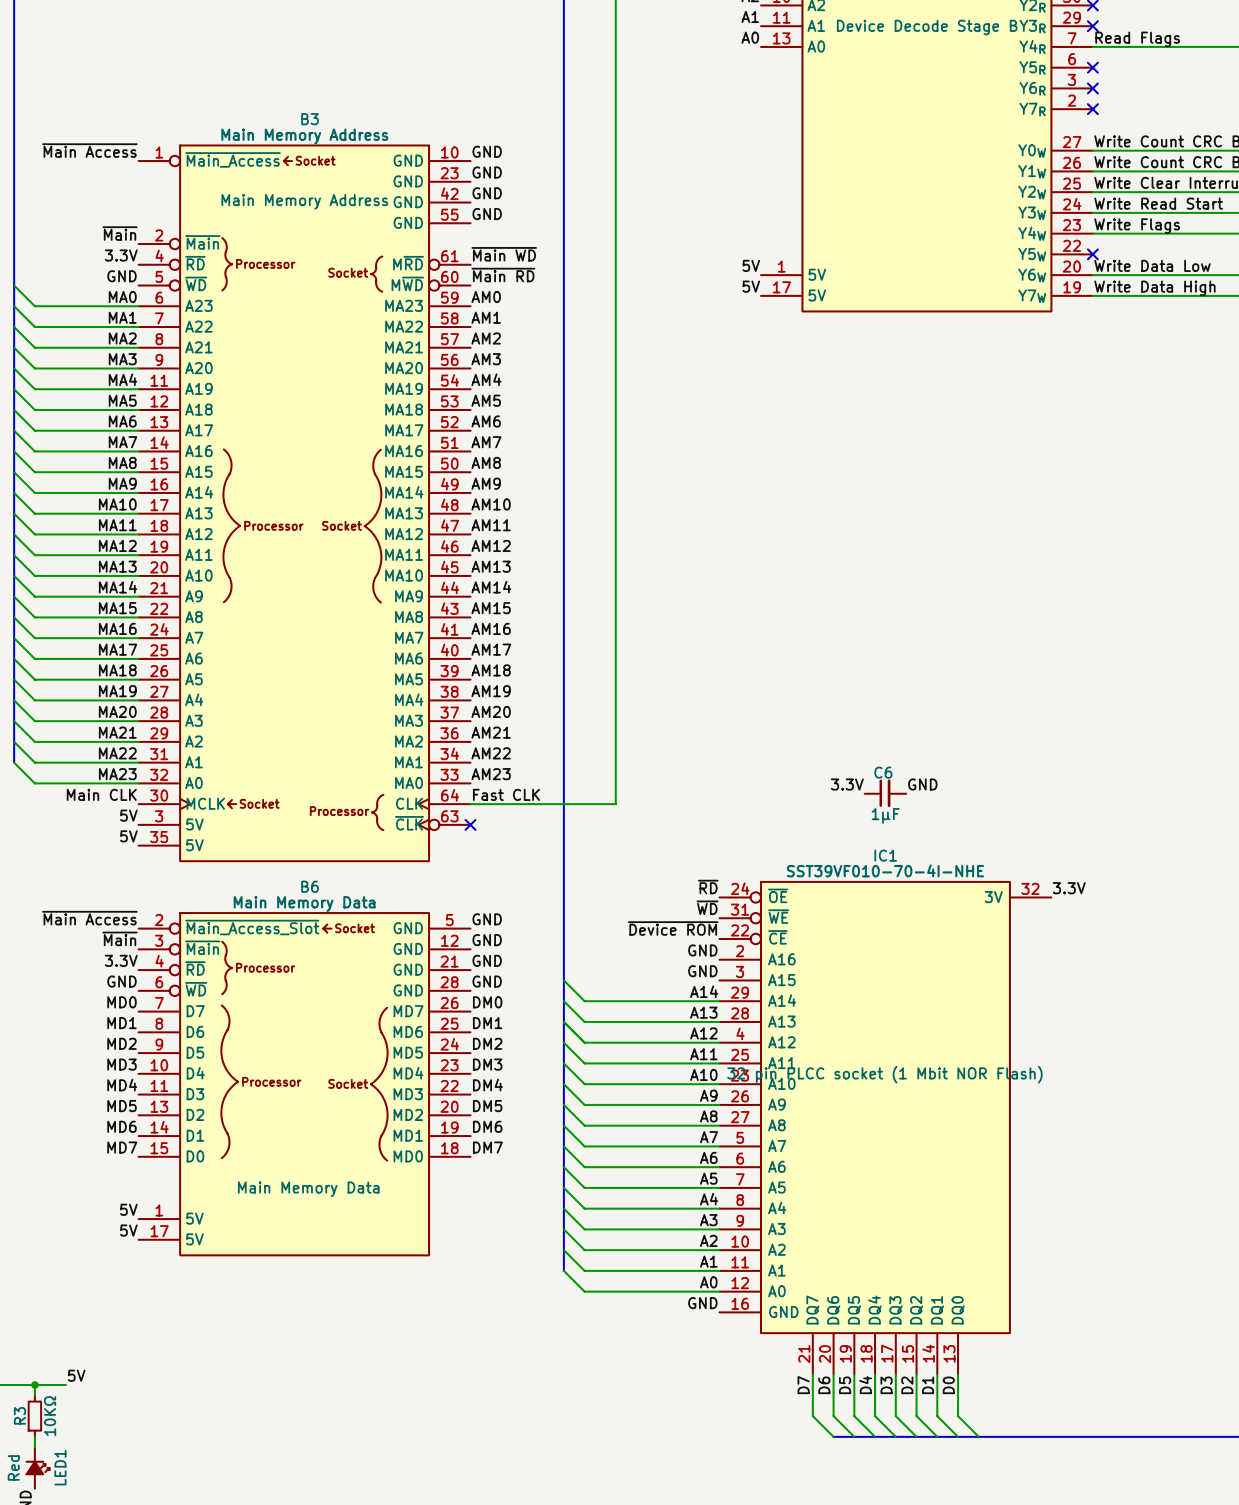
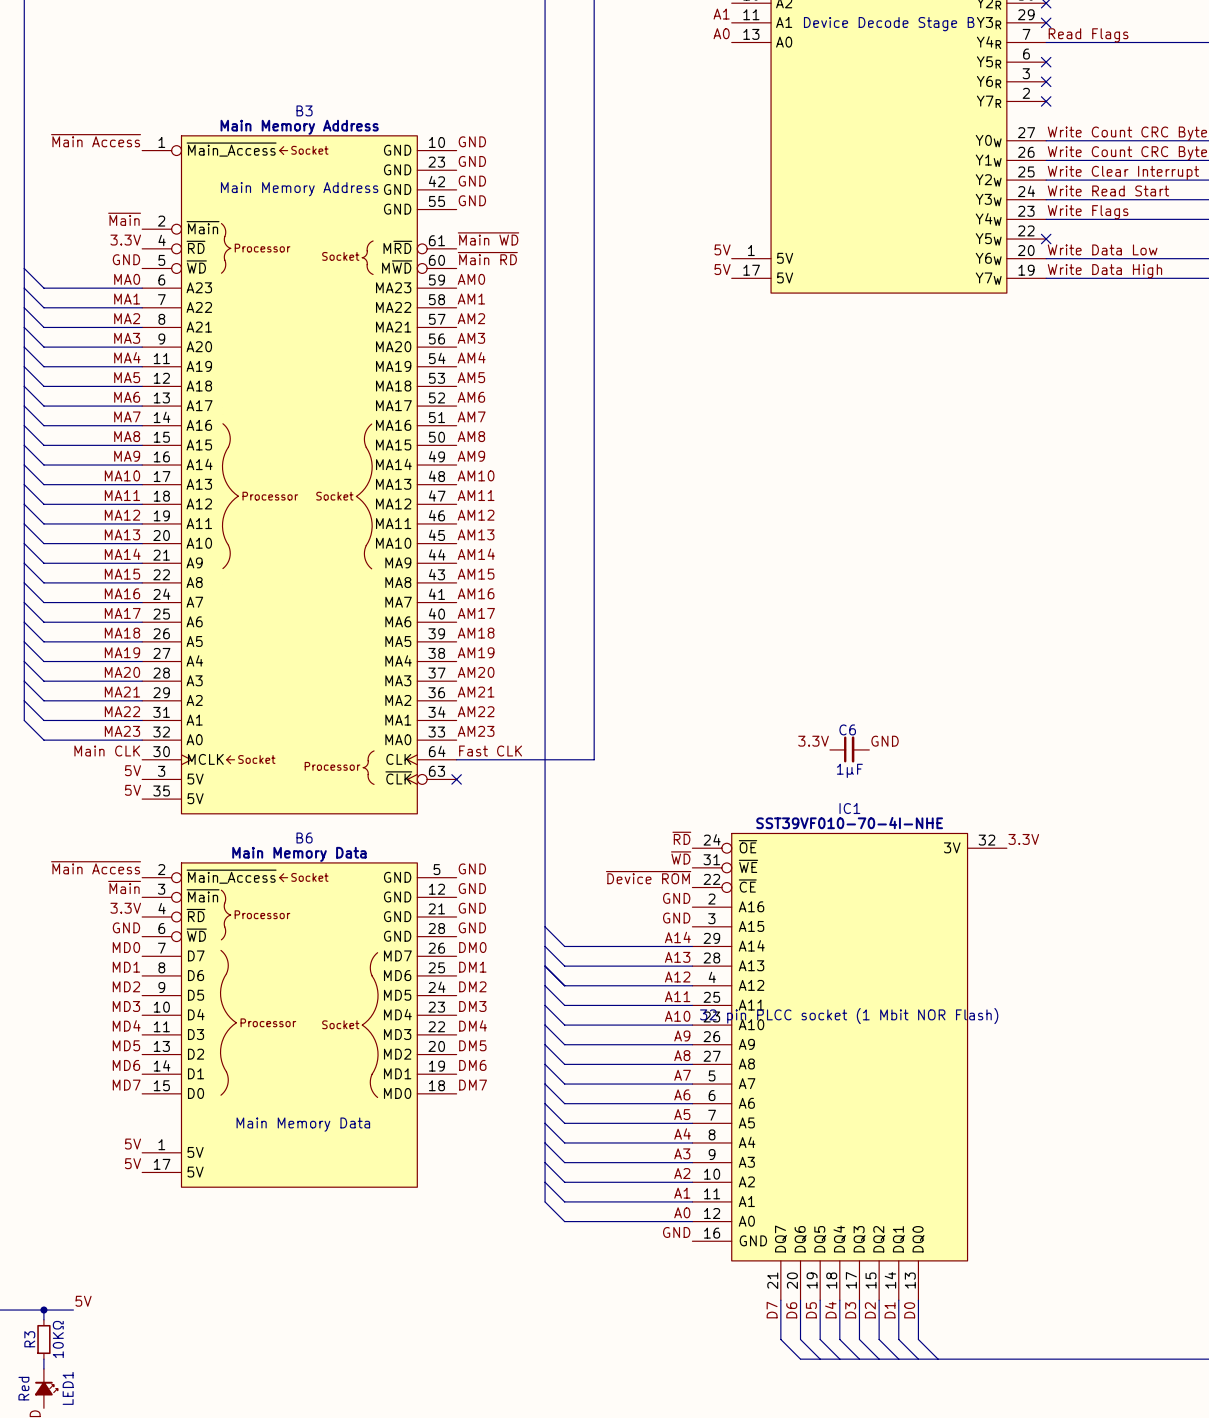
B6 symbol: [138, 912, 471, 1256] -> [142, 862, 457, 1188]

